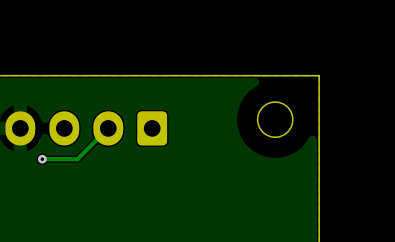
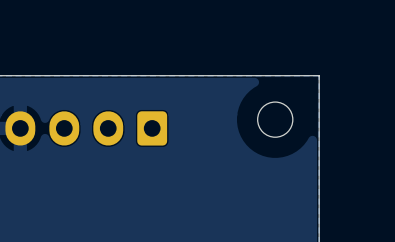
track: (108, 128) (77, 159) (42, 159) -> none
via: (42, 159) -> none

